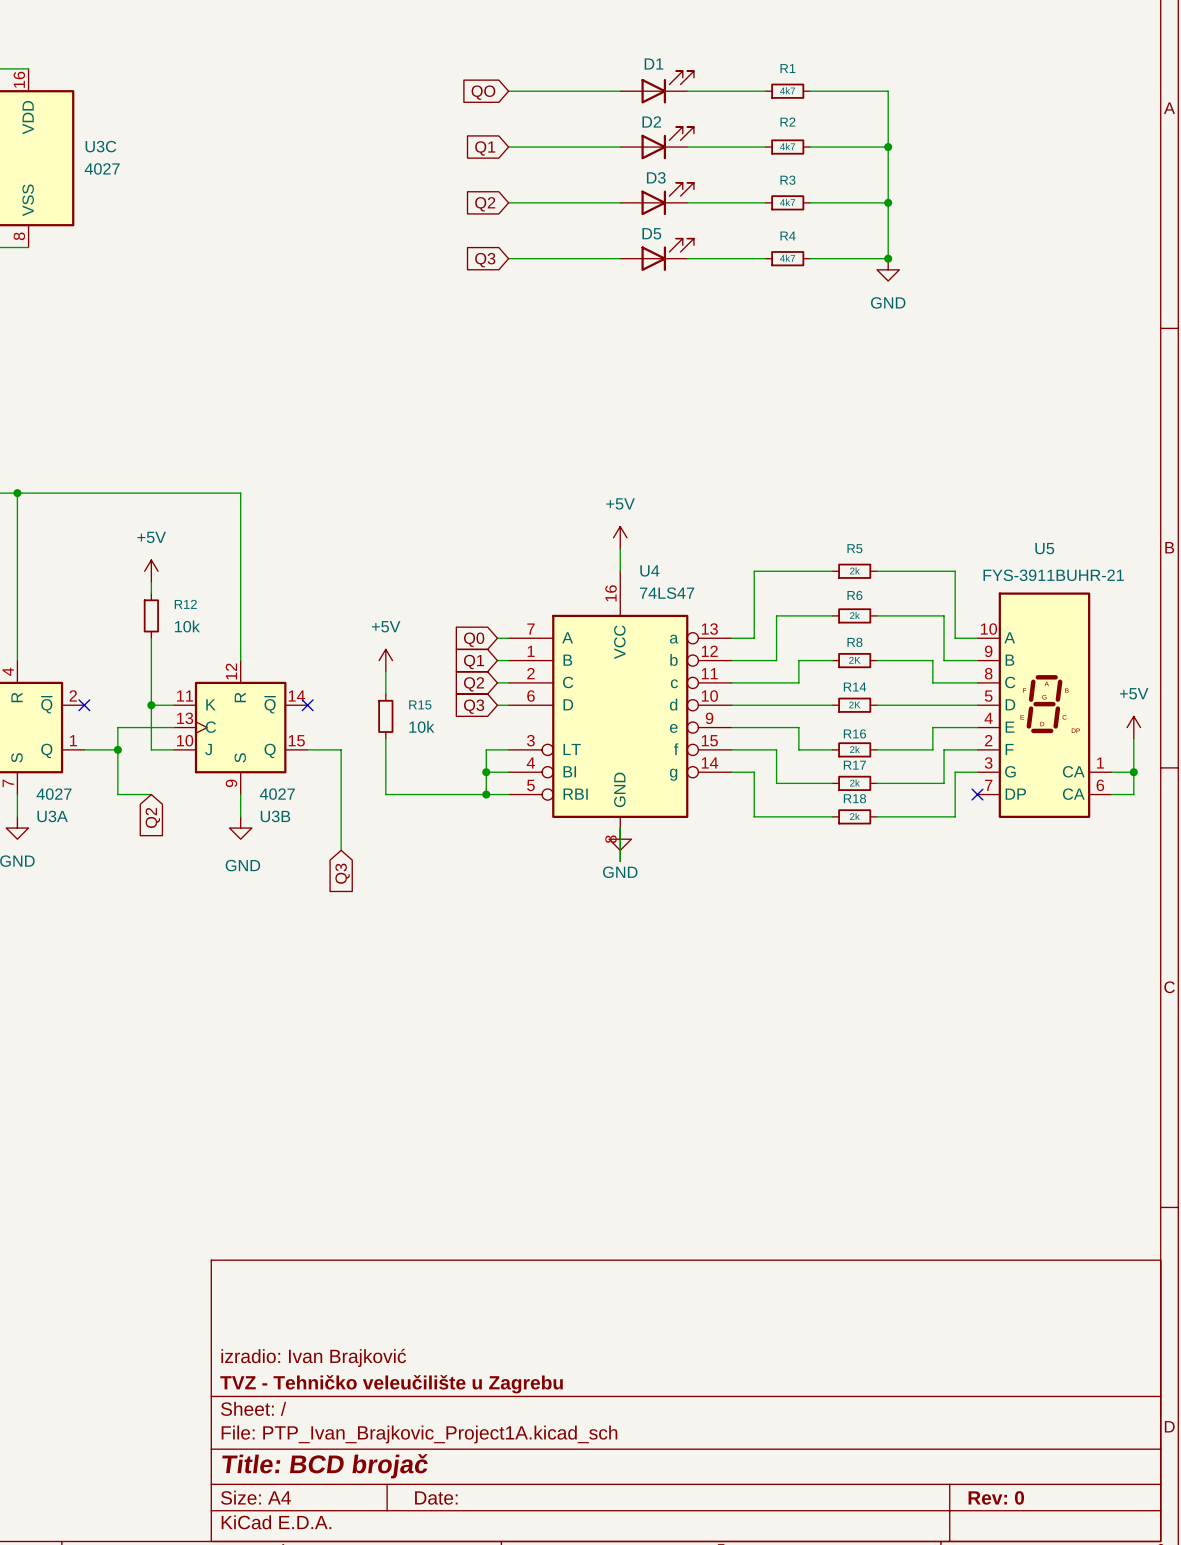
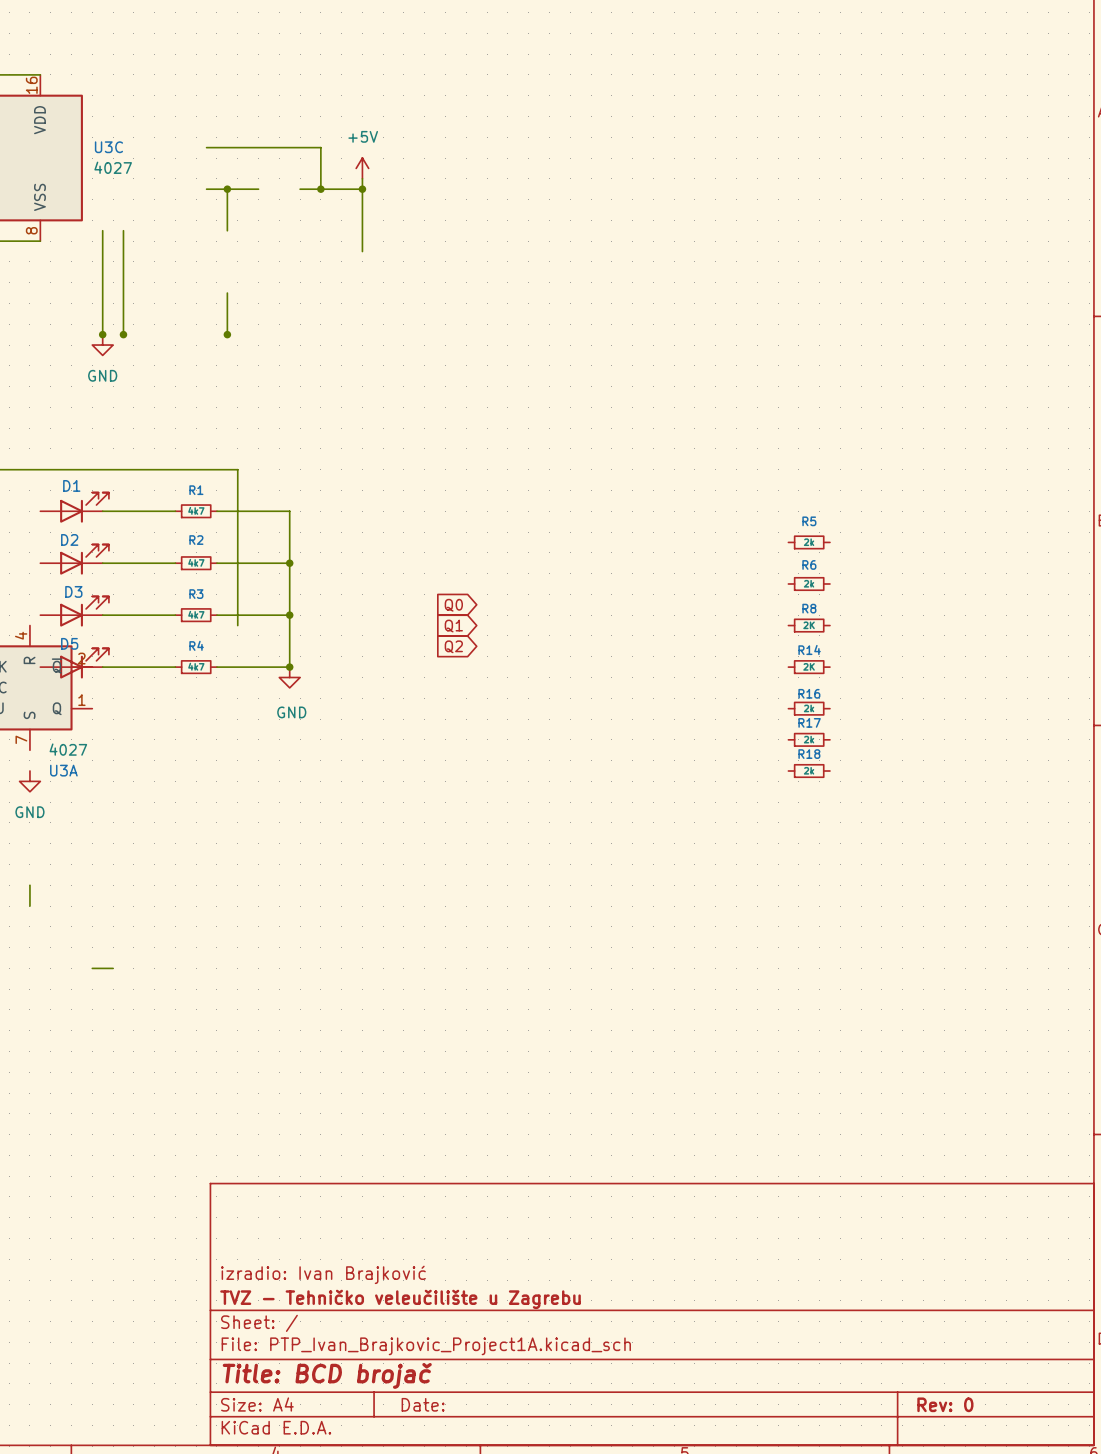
D1 position: (657, 87) -> (74, 507)
wire: (508, 91) (620, 91) -> none
wire: (687, 91) (765, 91) -> none
R1 position: (787, 91) -> (196, 511)
wire: (810, 91) (888, 91) (888, 258) (810, 258) -> none
global label: QO (483, 92) -> none
D2 position: (657, 143) -> (74, 559)
wire: none -> (206, 147) (320, 147) (320, 189)
wire: (508, 147) (620, 147) -> none
wire: (687, 147) (765, 147) -> none
R2 position: (787, 147) -> (196, 563)
wire: (810, 147) (888, 147) -> none
junction: (888, 147) -> none
global label: Q1 (485, 148) -> none
power symbol: none -> +5V (362, 168)
wire: none -> (362, 178) (362, 251)
wire: none -> (206, 189) (258, 189)
wire: none -> (227, 189) (227, 230)
junction: none -> (227, 189)
wire: none -> (300, 189) (362, 189)
junction: none -> (320, 189)
junction: none -> (362, 189)
D3 position: (657, 198) -> (74, 611)
wire: (508, 202) (620, 202) -> none
wire: (687, 202) (765, 202) -> none
R3 position: (787, 202) -> (196, 615)
wire: (810, 202) (888, 202) -> none
junction: (888, 202) -> none
global label: Q2 (485, 204) -> none
wire: none -> (102, 230) (102, 334)
wire: none -> (123, 230) (123, 334)
D5 position: (657, 254) -> (74, 663)
wire: (508, 258) (620, 258) -> none
wire: (687, 258) (765, 258) -> none
R4 position: (787, 258) -> (196, 667)
junction: (888, 258) -> none
global label: Q3 (485, 260) -> none
power symbol: GND (888, 269) -> none
wire: none -> (227, 293) (227, 334)
junction: none -> (102, 334)
junction: none -> (123, 334)
junction: none -> (227, 334)
power symbol: none -> GND (102, 345)
wire: (17, 493) (17, 660) -> none
junction: (17, 493) -> none
wire: none -> (102, 511) (175, 511)
wire: none -> (216, 511) (289, 511) (289, 667) (216, 667)
power symbol: +5V (620, 537) -> none
wire: (620, 548) (620, 571) -> none
power symbol: +5V (151, 571) -> none
wire: (832, 571) (754, 571) (754, 638) (731, 638) -> none
wire: (877, 571) (955, 571) (955, 638) (977, 638) -> none
wire: (151, 582) (151, 593) -> none
wire: none -> (102, 563) (175, 563)
wire: none -> (216, 563) (289, 563)
junction: none -> (289, 563)
R12: 10k (151, 615) -> none
wire: (832, 615) (776, 615) (776, 660) (731, 660) -> none
wire: (877, 615) (944, 615) (944, 660) (977, 660) -> none
wire: (151, 638) (151, 749) (173, 749) -> none
wire: (497, 638) (508, 638) -> none
wire: none -> (102, 615) (175, 615)
wire: none -> (216, 615) (289, 615)
junction: none -> (289, 615)
power symbol: +5V (385, 660) -> none
wire: (497, 660) (508, 660) -> none
wire: (832, 660) (798, 660) (798, 682) (731, 682) -> none
wire: (877, 660) (932, 660) (932, 682) (977, 682) -> none
wire: (385, 671) (385, 694) -> none
wire: (497, 682) (508, 682) -> none
no-connect mark: (84, 705) -> none
wire: none -> (102, 667) (154, 667)
junction: (151, 705) -> none
junction: none -> (289, 667)
no-connect mark: (307, 705) -> none
wire: (497, 705) (508, 705) -> none
wire: (731, 705) (832, 705) -> none
wire: (877, 705) (977, 705) -> none
U5: FYS-3911BUHR-21 (1044, 705) -> none
global label: Q3 (474, 706) -> none
R15: 10k (385, 716) -> none
U4: 74LS47 (620, 716) -> none
wire: (173, 727) (117, 727) (117, 794) (151, 794) -> none
U3B: 4027 (240, 727) -> none
wire: (731, 727) (798, 727) (798, 749) (832, 749) -> none
wire: (977, 727) (932, 727) (932, 749) (877, 749) -> none
power symbol: +5V (1133, 727) -> none
wire: (385, 738) (385, 794) (508, 794) -> none
wire: (1133, 738) (1133, 794) (1111, 794) -> none
wire: (84, 749) (117, 749) -> none
junction: (117, 749) -> none
wire: (307, 749) (341, 749) (341, 850) -> none
wire: (508, 749) (486, 749) (486, 794) -> none
wire: (731, 749) (776, 749) (776, 783) (832, 783) -> none
wire: (977, 749) (944, 749) (944, 783) (877, 783) -> none
wire: (486, 772) (508, 772) -> none
junction: (486, 772) -> none
wire: (731, 772) (754, 772) (754, 816) (832, 816) -> none
wire: (977, 772) (955, 772) (955, 816) (877, 816) -> none
wire: (1111, 772) (1133, 772) -> none
junction: (1133, 772) -> none
wire: (17, 794) (17, 816) -> (29, 885) (29, 906)
wire: (240, 794) (240, 816) -> none
junction: (486, 794) -> none
no-connect mark: (977, 794) -> none
global label: Q2 (152, 817) -> none
power symbol position: GND (240, 828) -> GND (289, 677)
wire: (620, 828) (620, 861) -> none
power symbol: GND (620, 839) -> none
global label: Q3 (342, 873) -> none
wire: none -> (92, 968) (113, 968)

